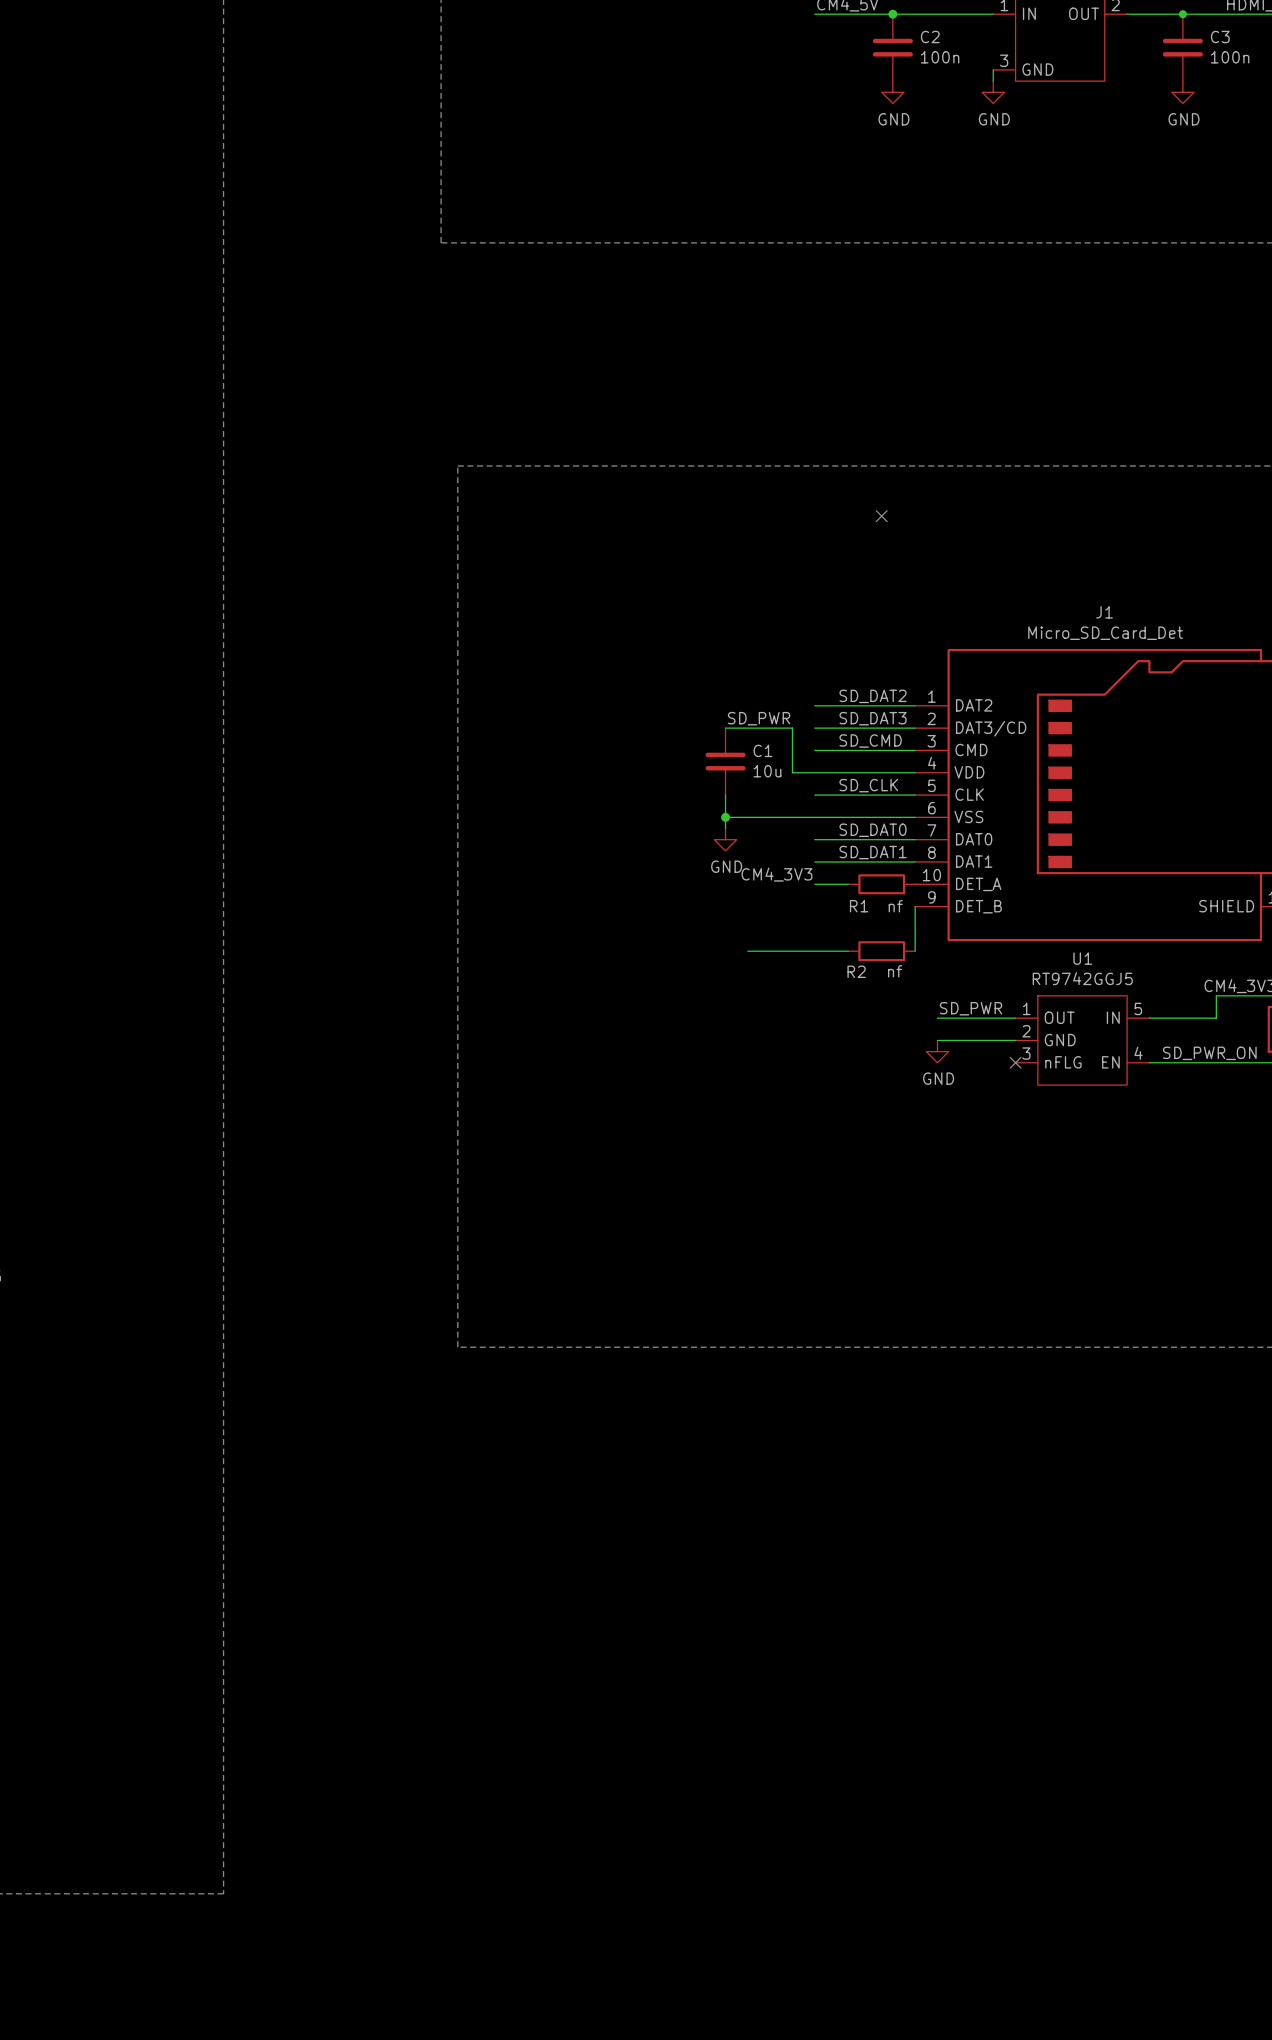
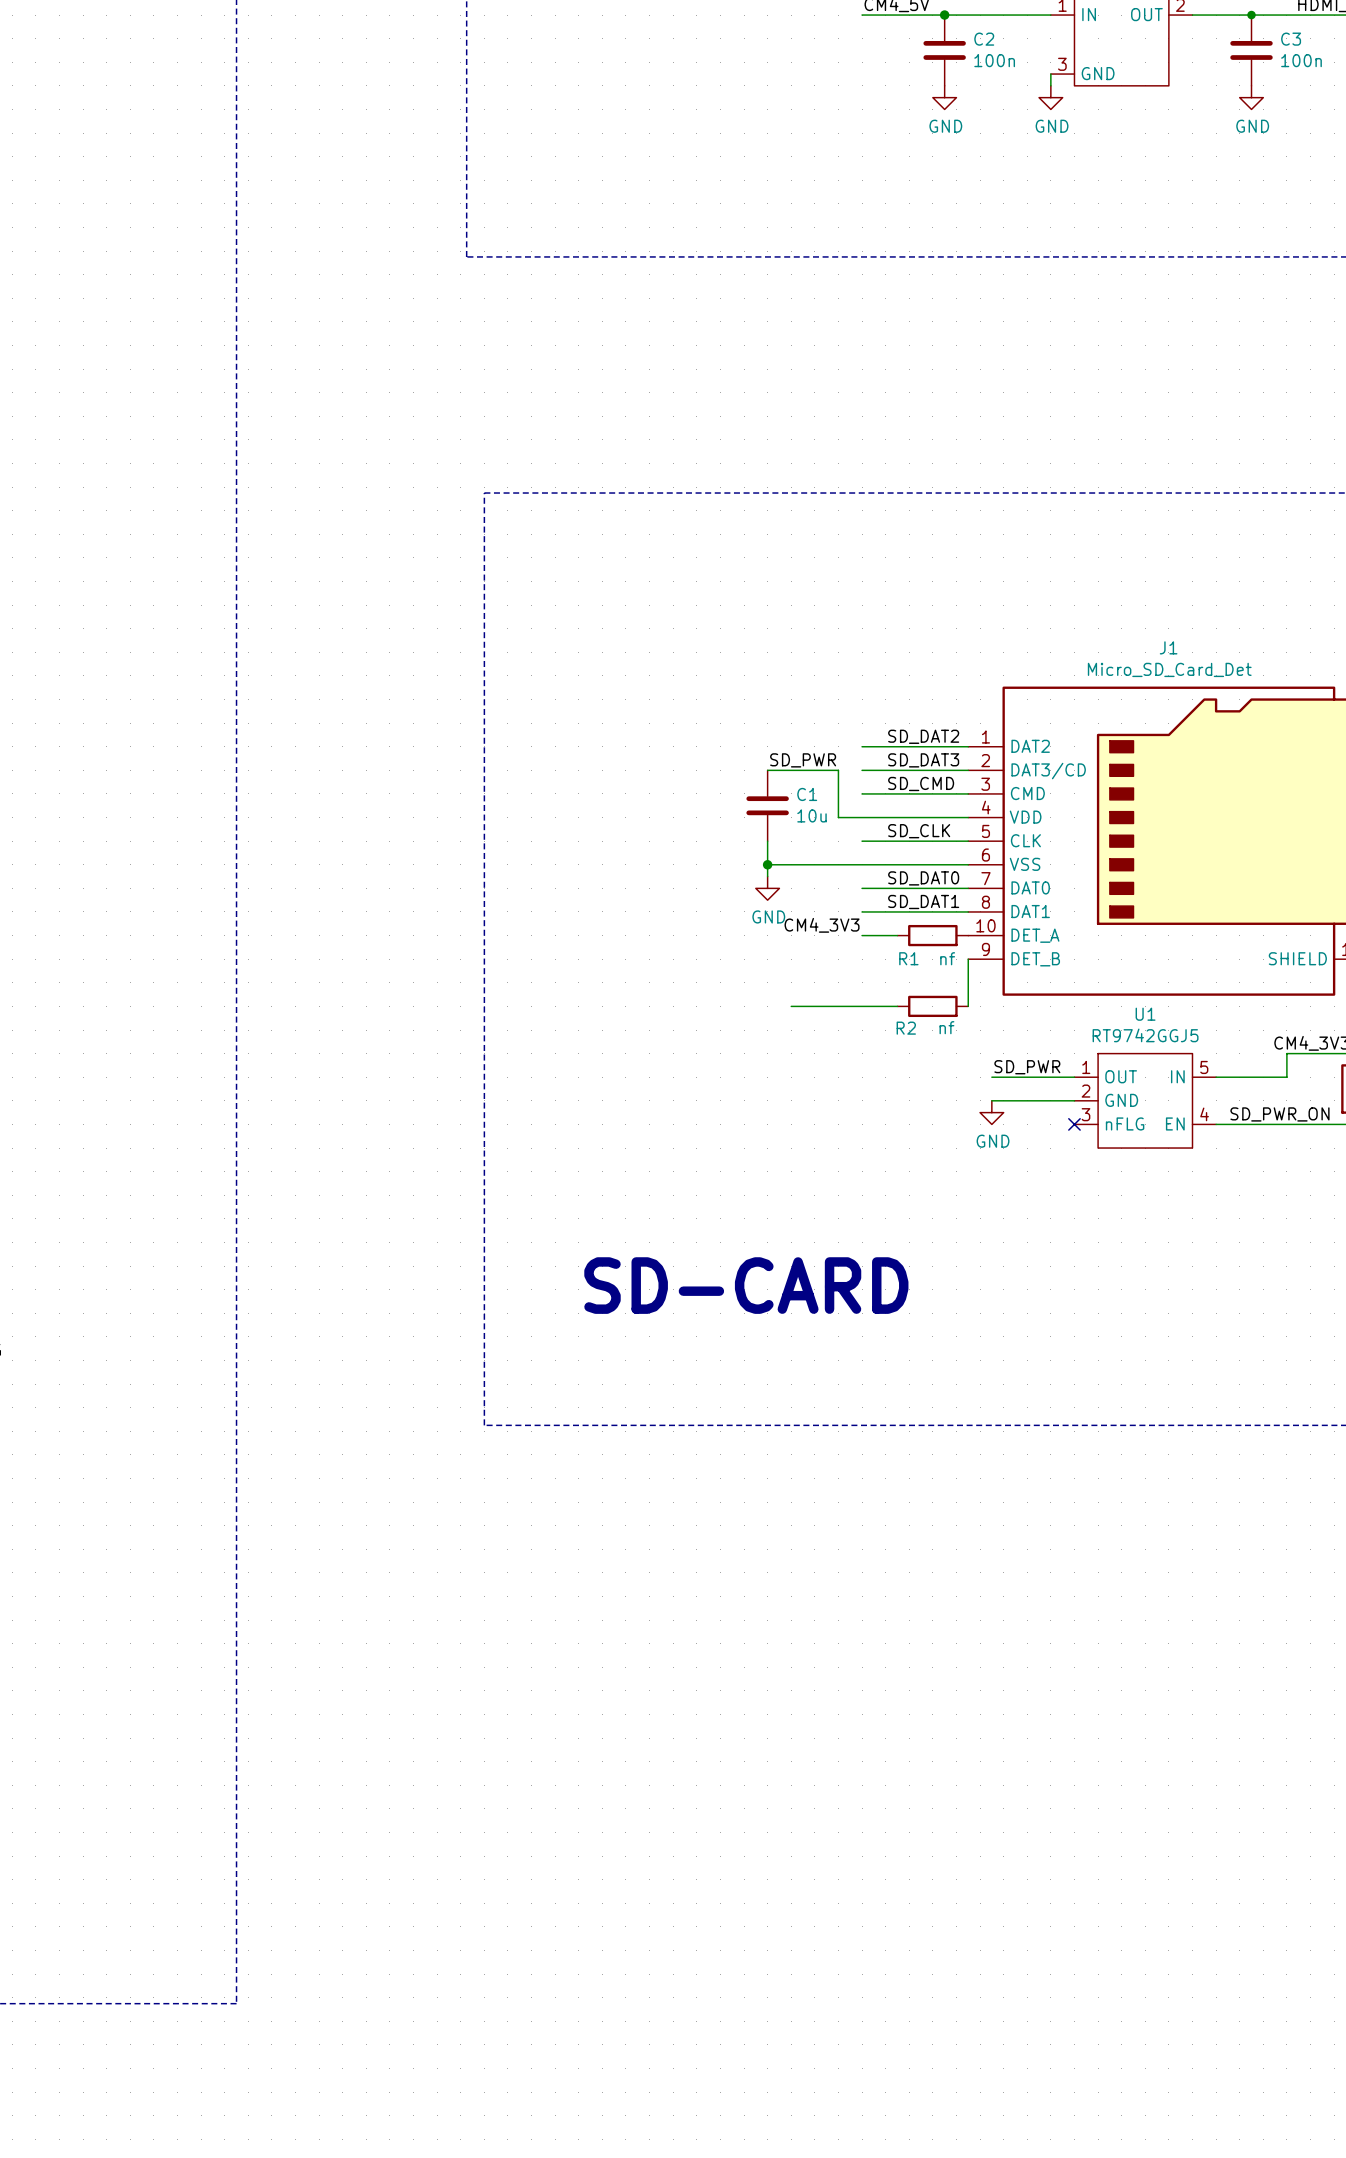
no-connect mark: (881, 516) -> none
text: none -> SD-CARD (746, 1285)

